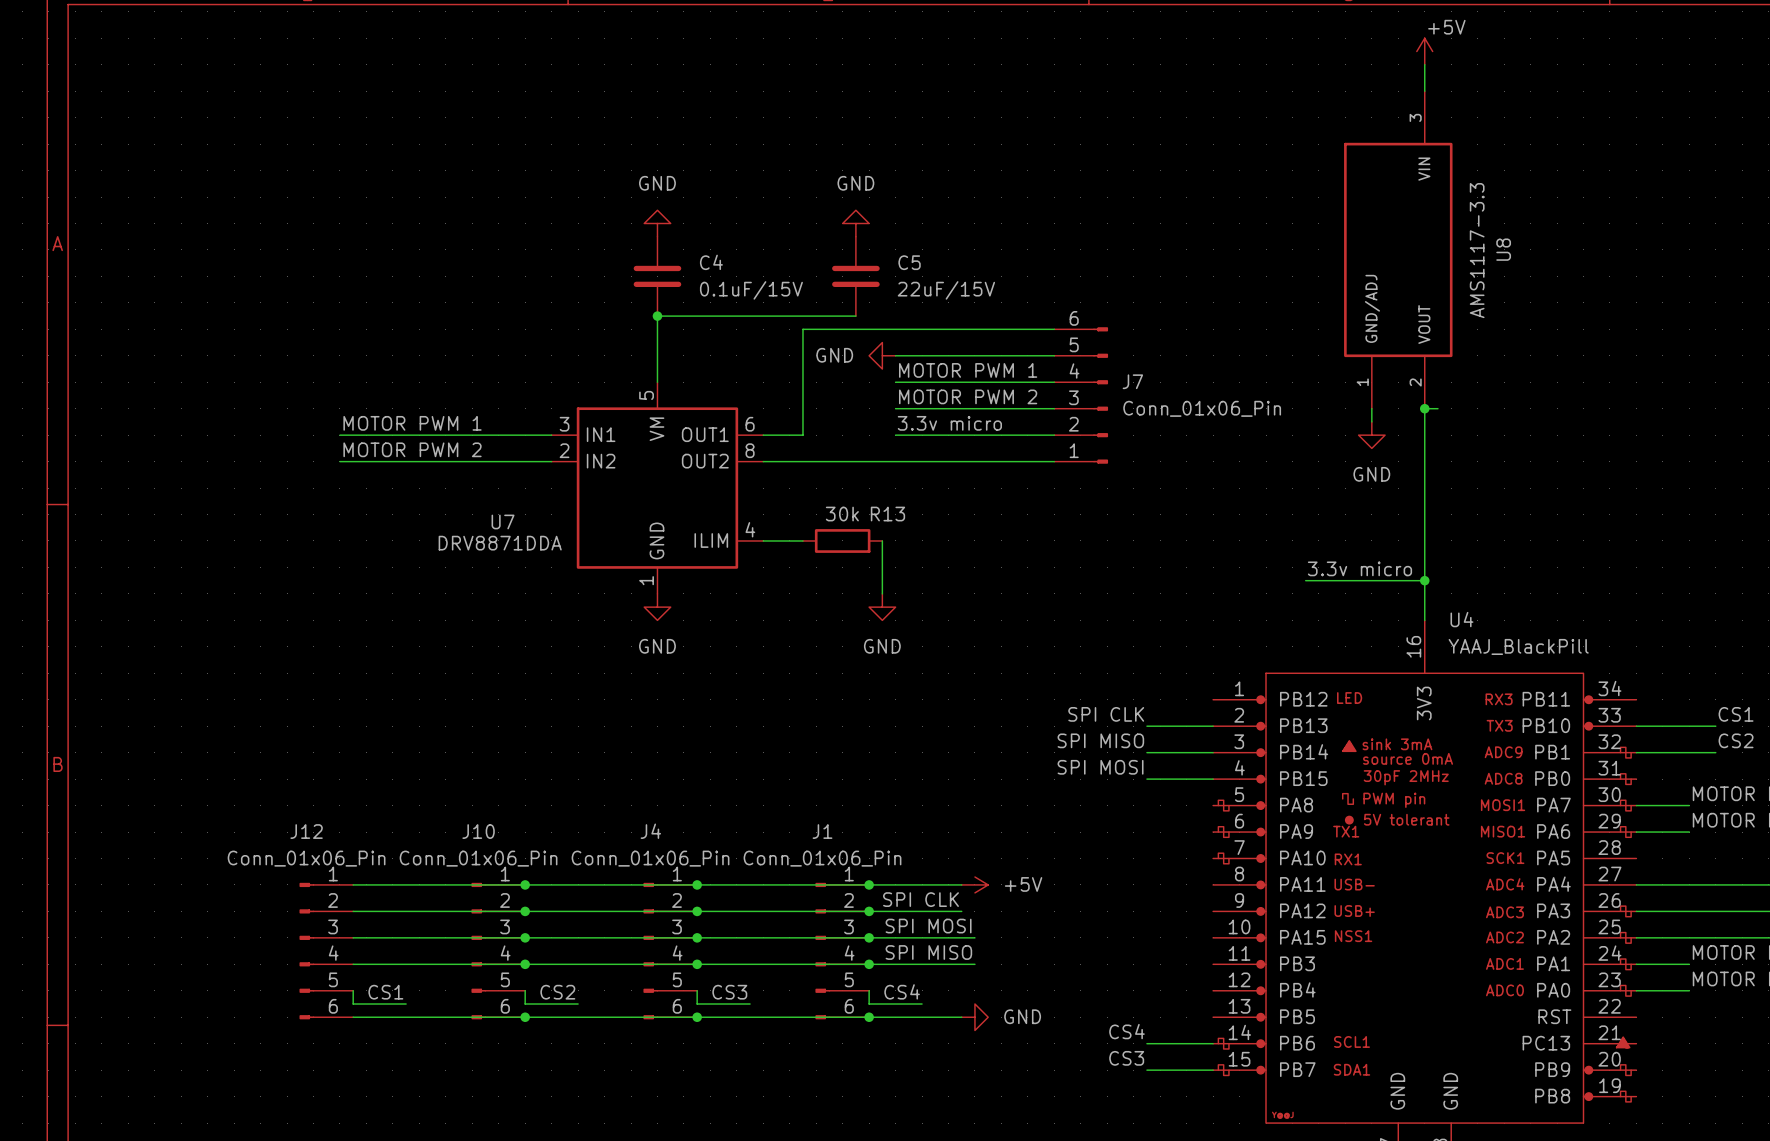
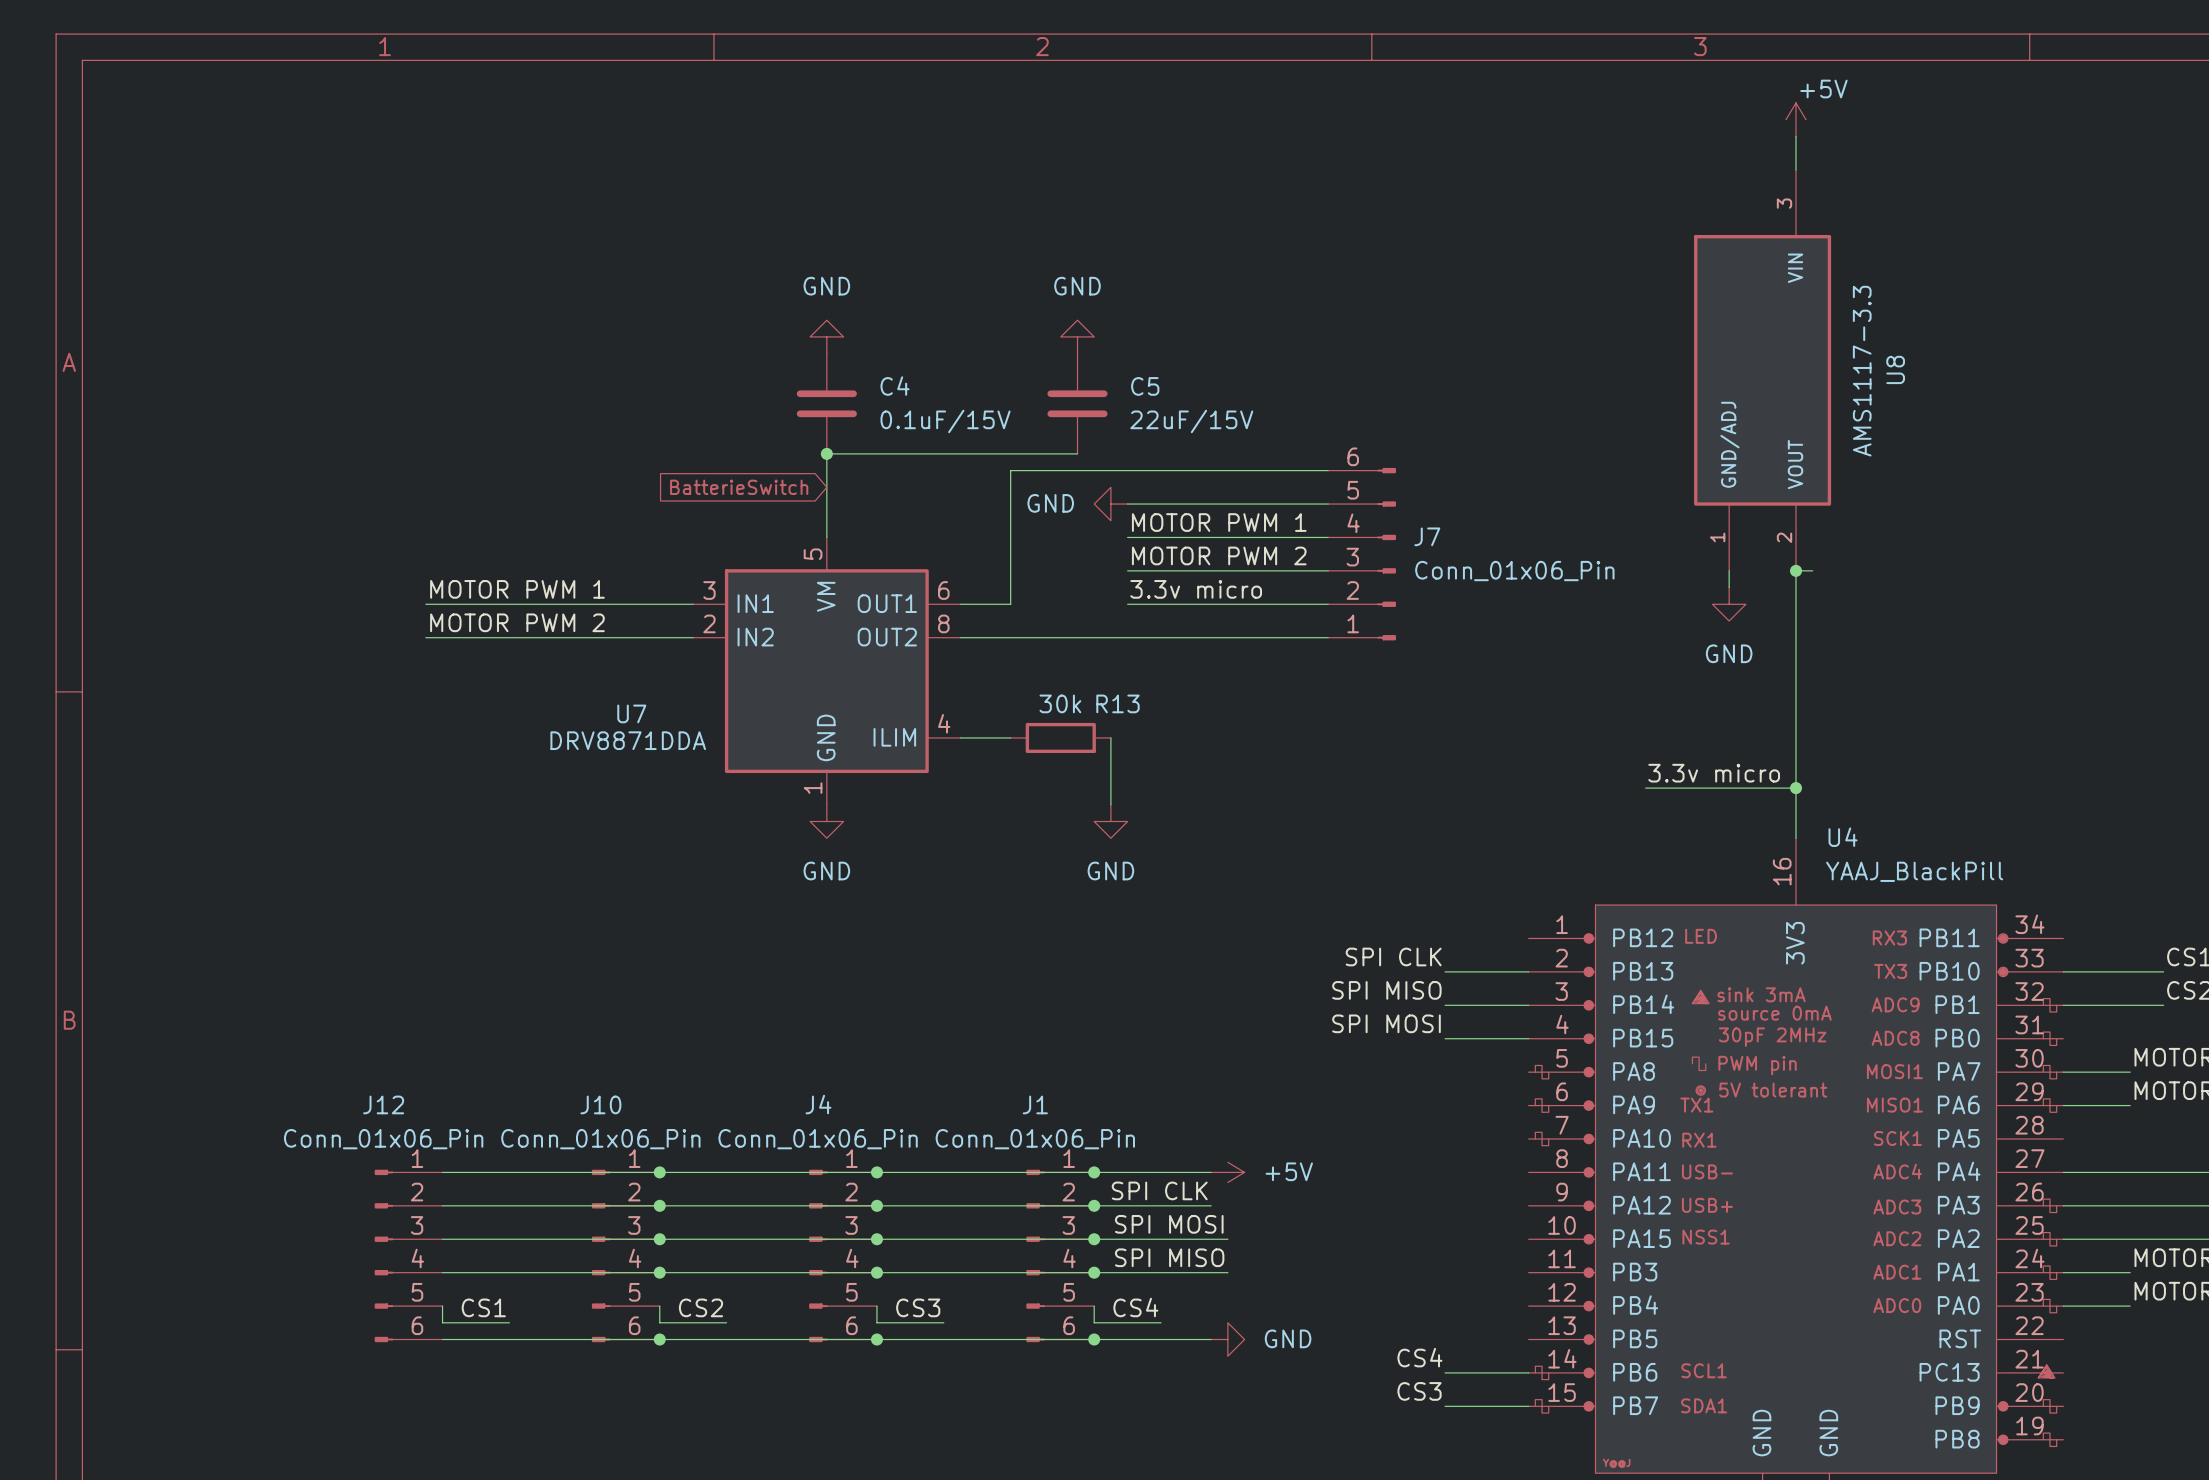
global label: none -> BatterieSwitch (739, 487)

